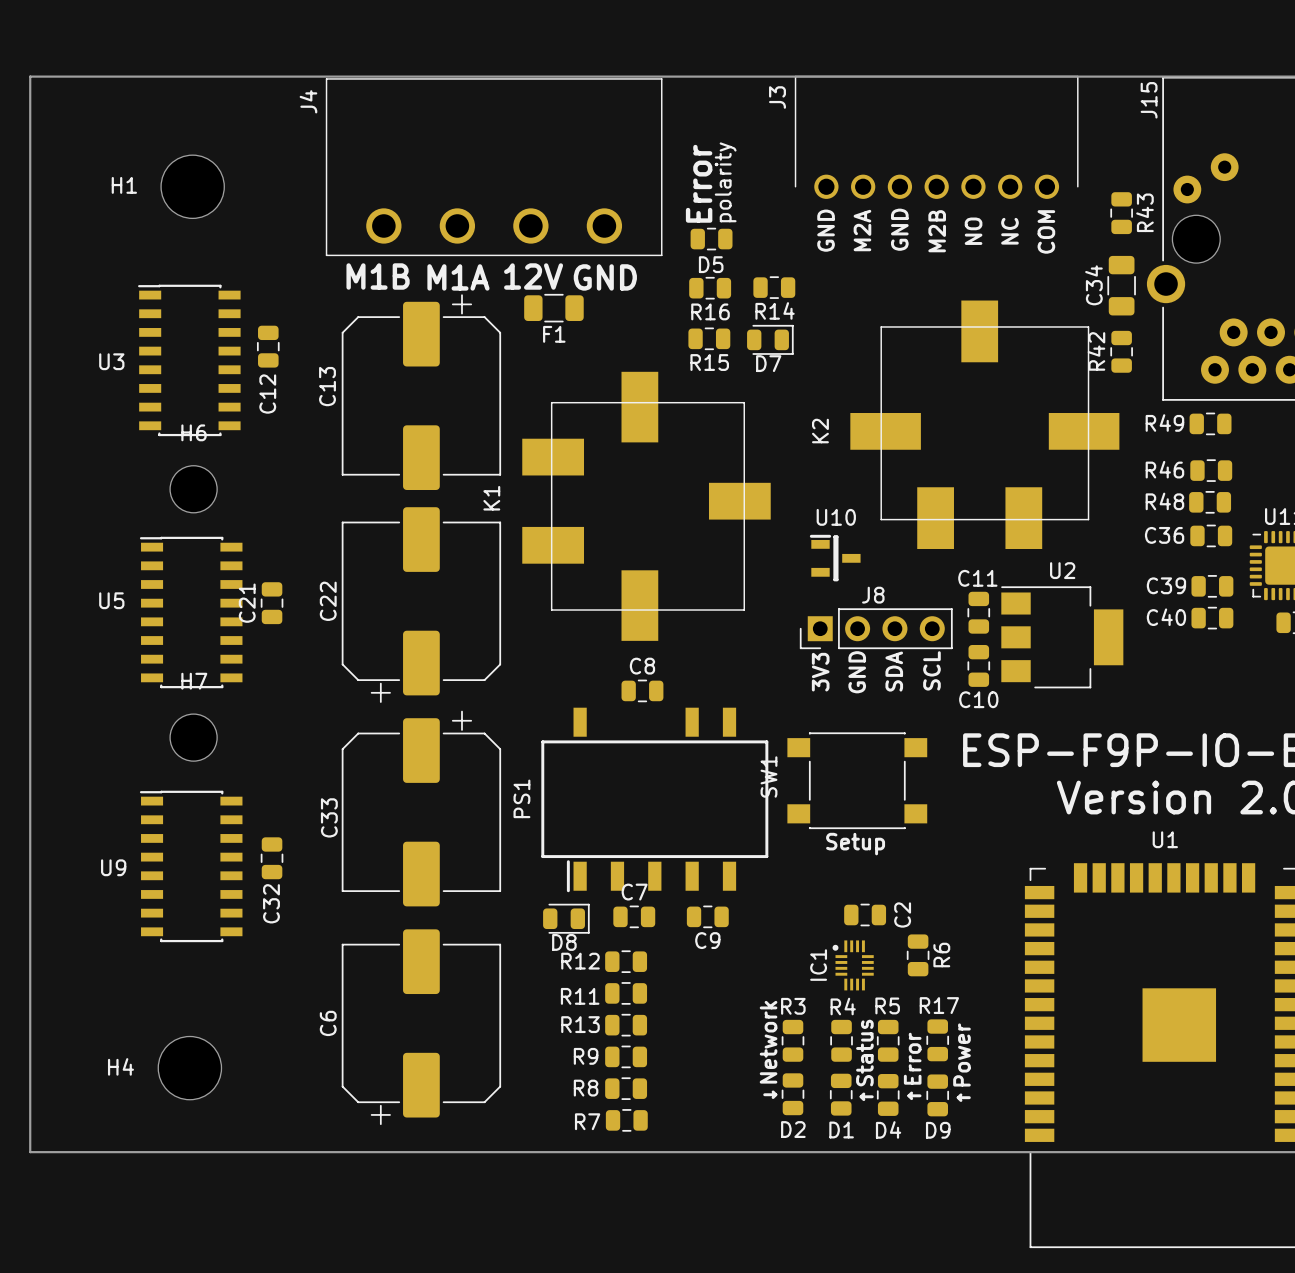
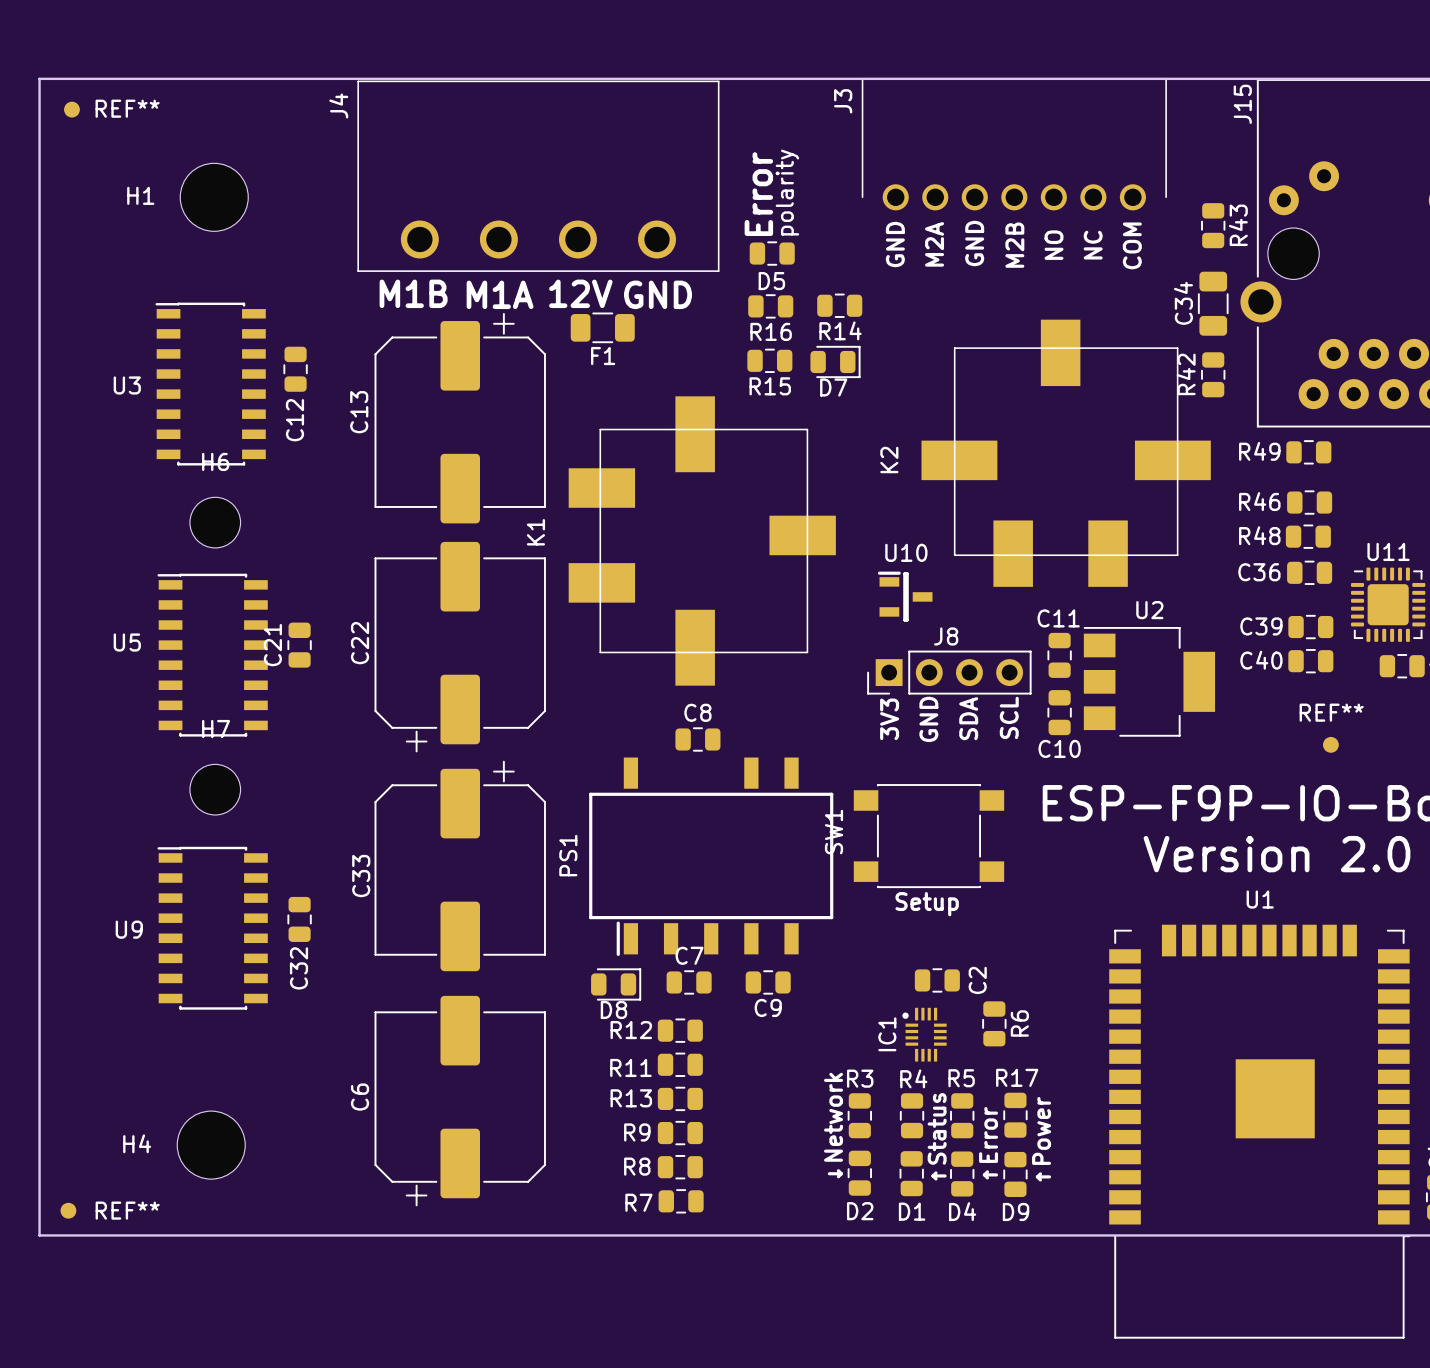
REF**: none -> (71, 109)
REF**: none -> (1330, 744)
REF**: none -> (68, 1210)

